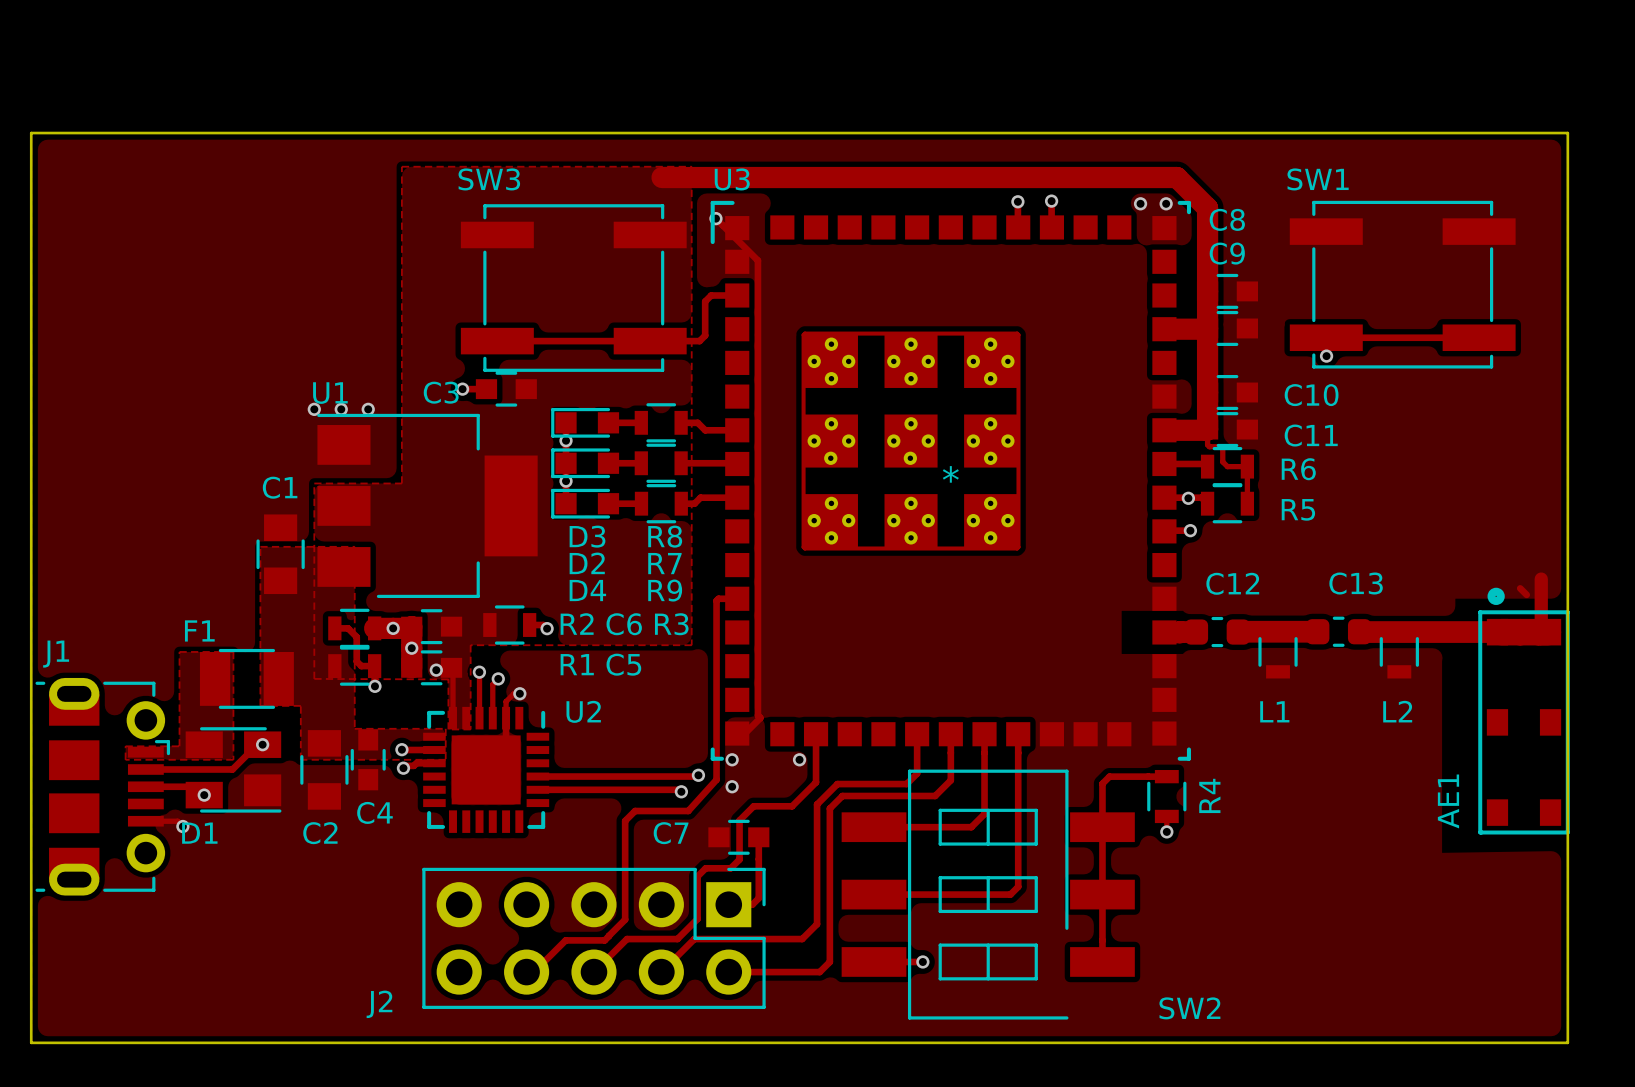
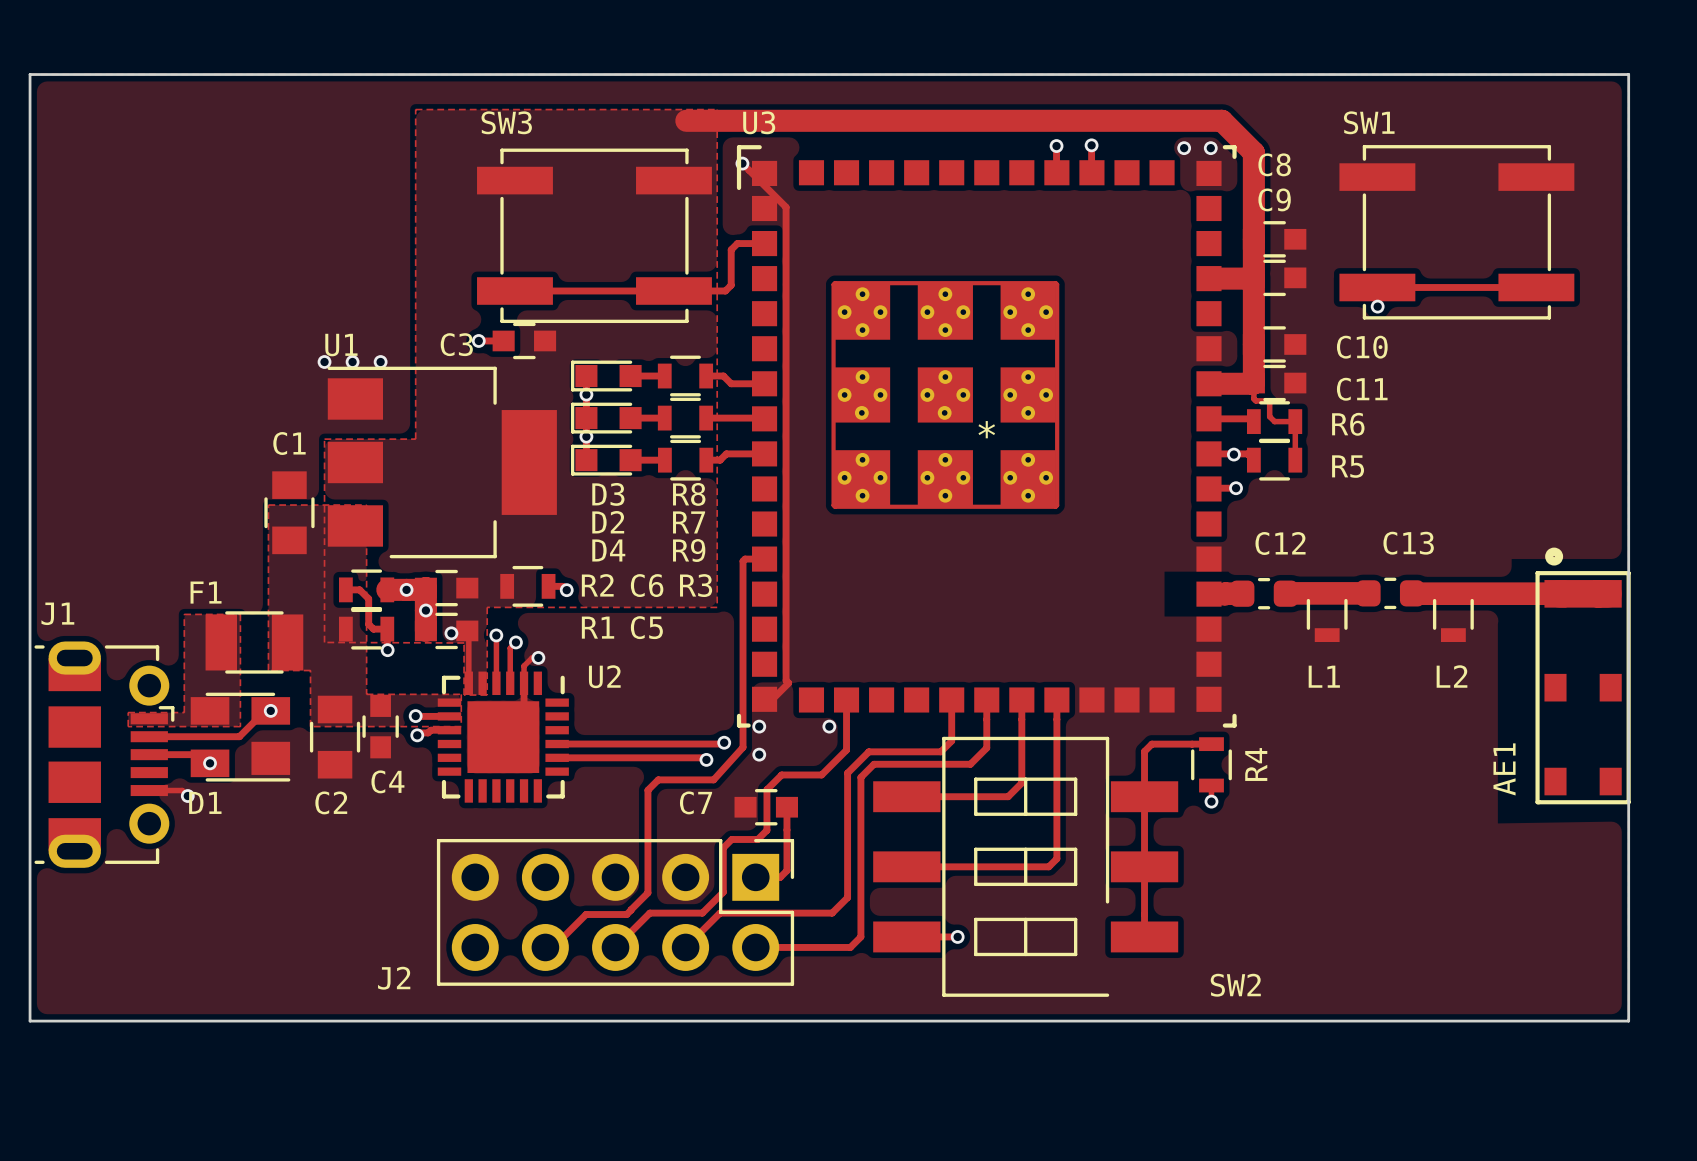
track: (1541, 579) (1541, 632) -> none
track: (1520, 588) (1526, 594) -> none

